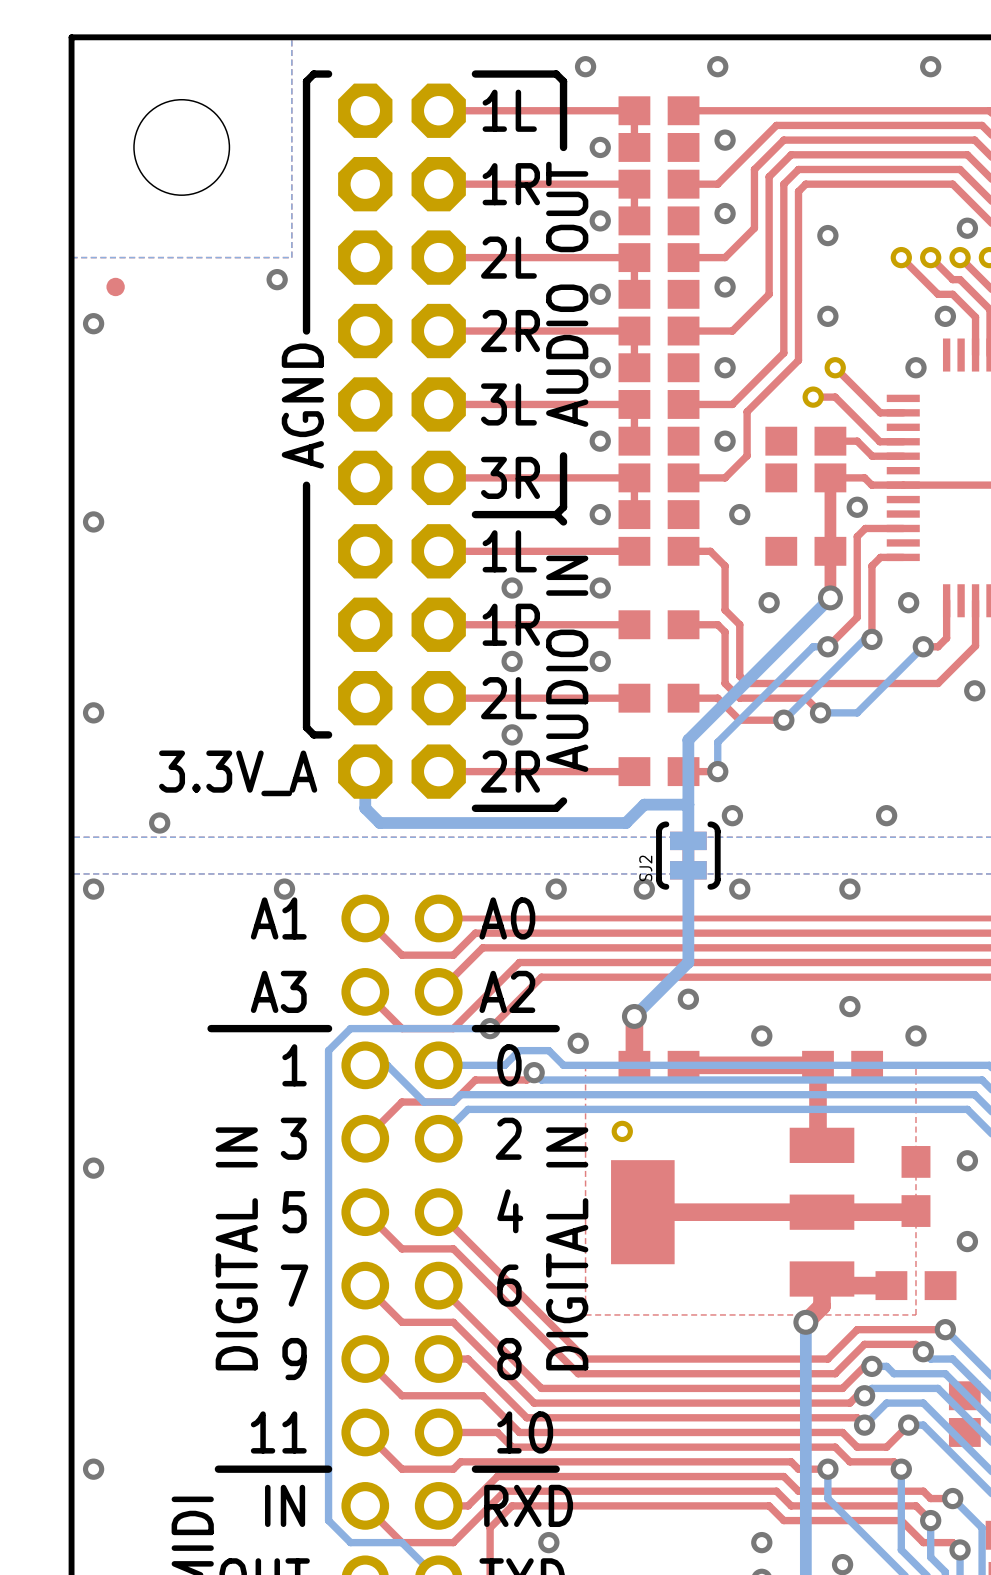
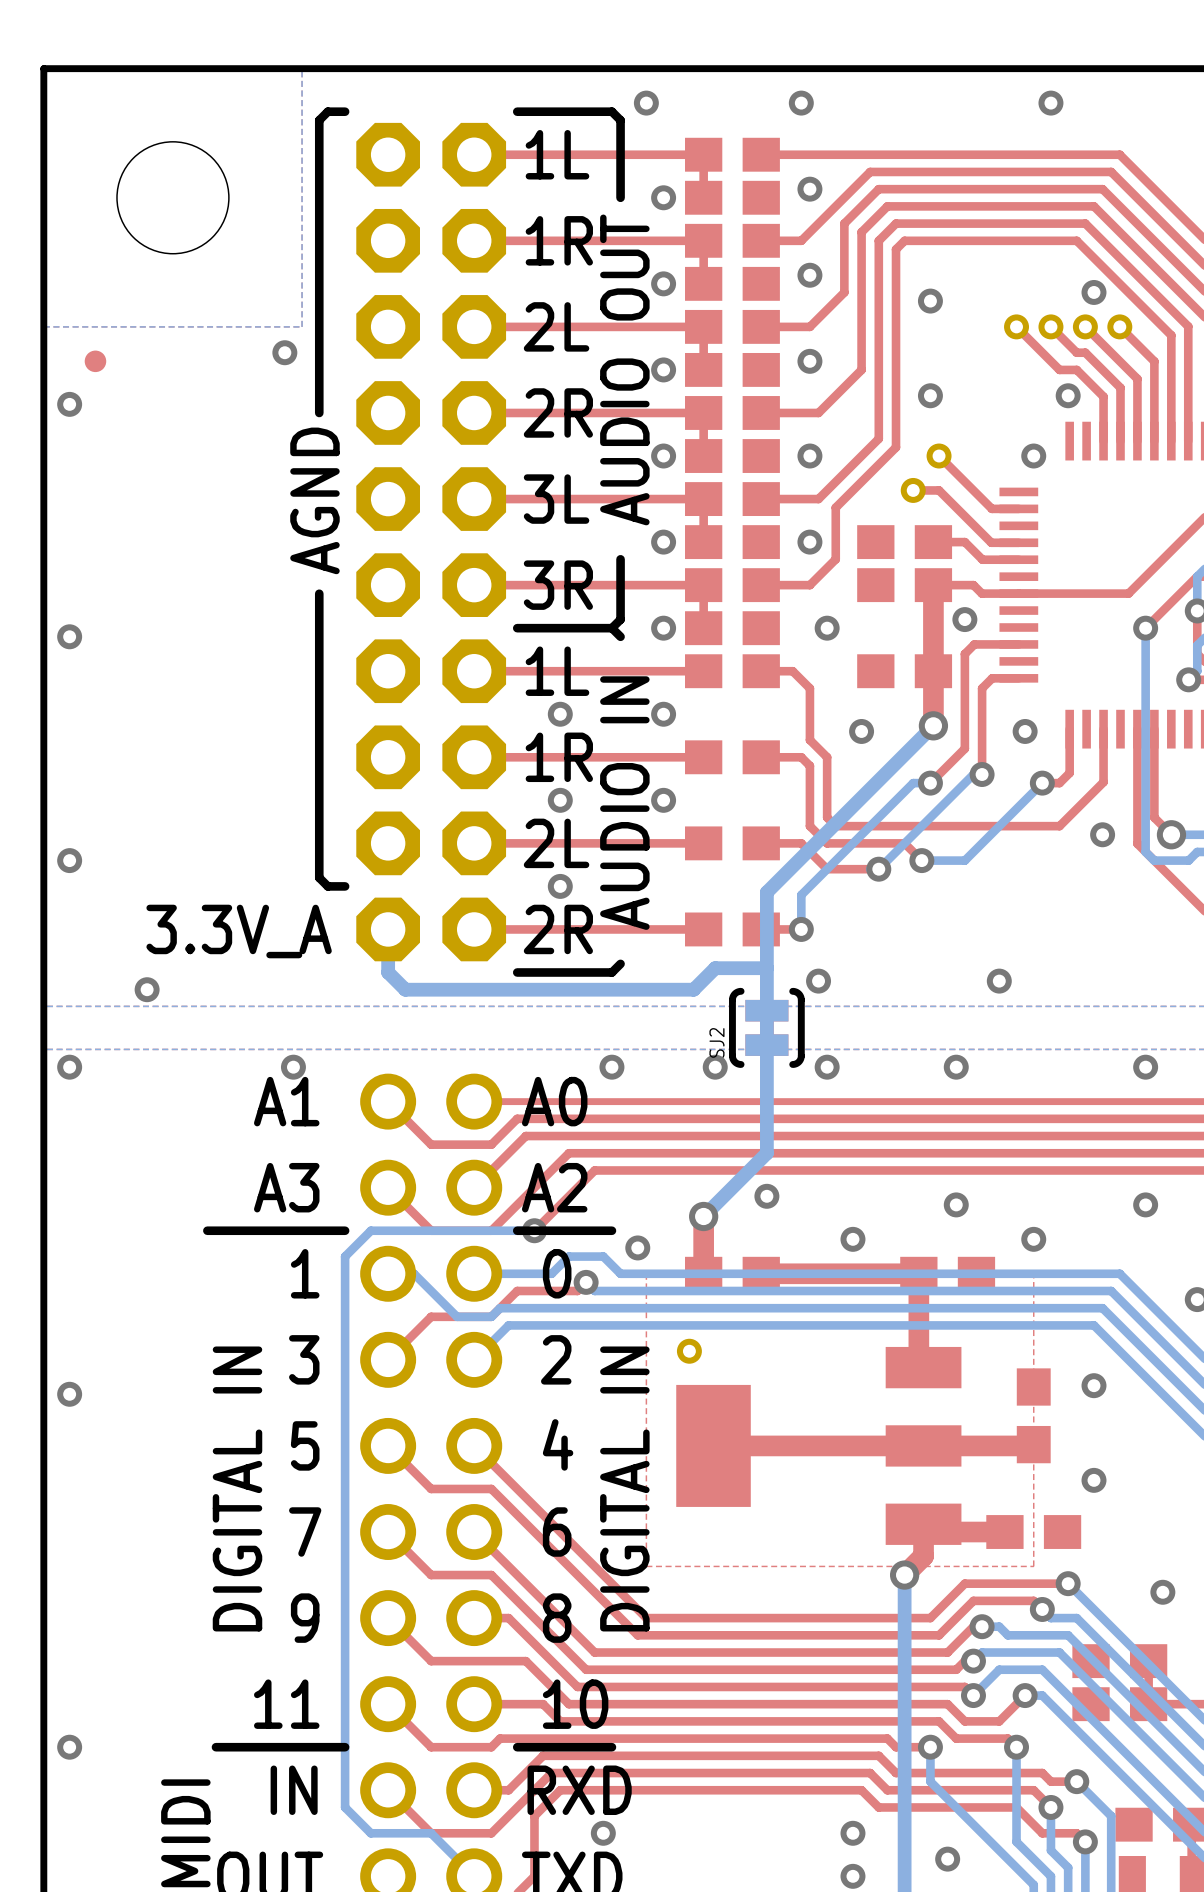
top track width: thin (830, 477) (830, 597) -> thick (933, 585) (933, 725)

